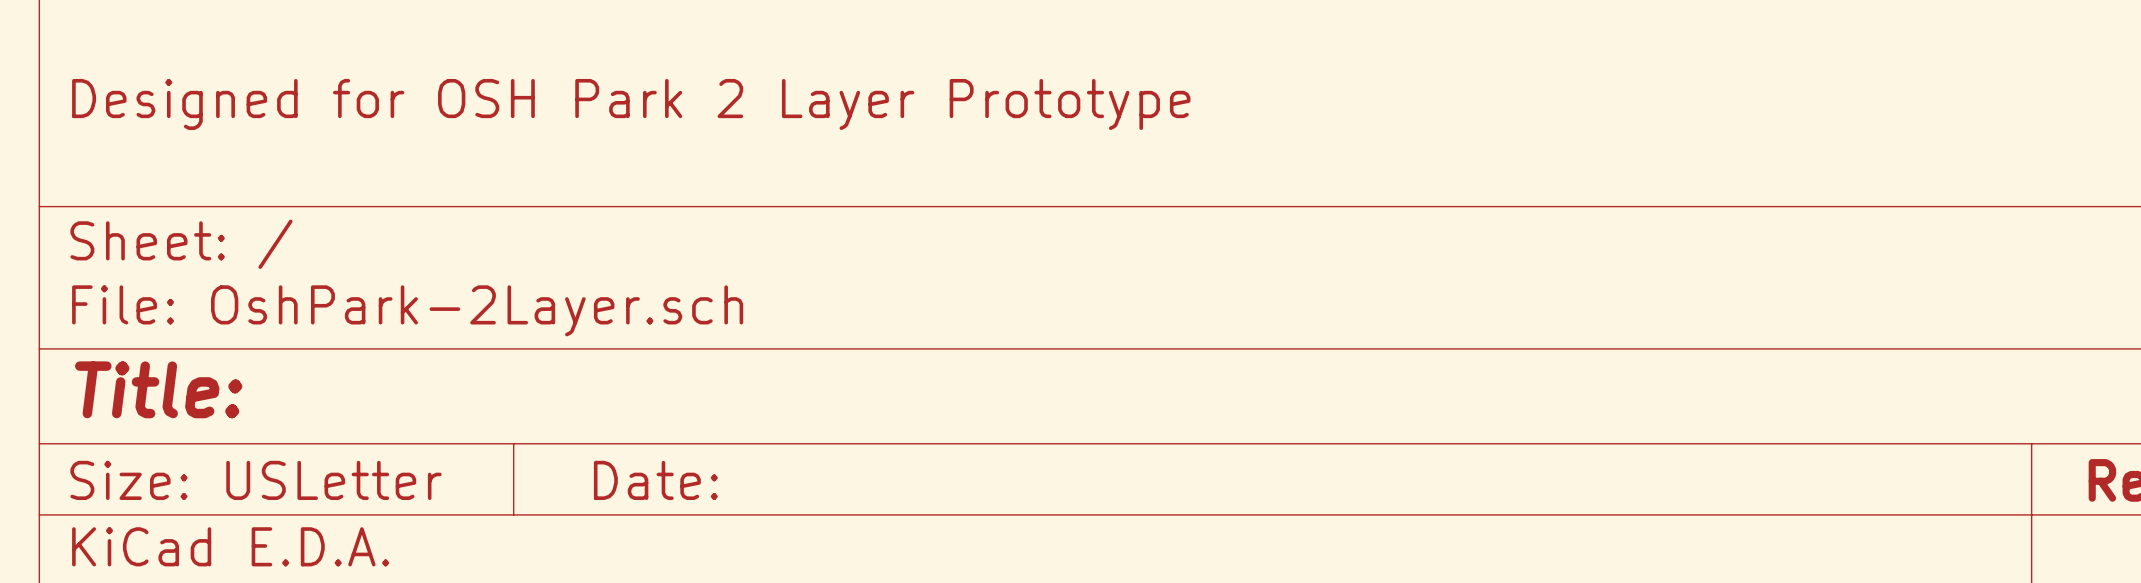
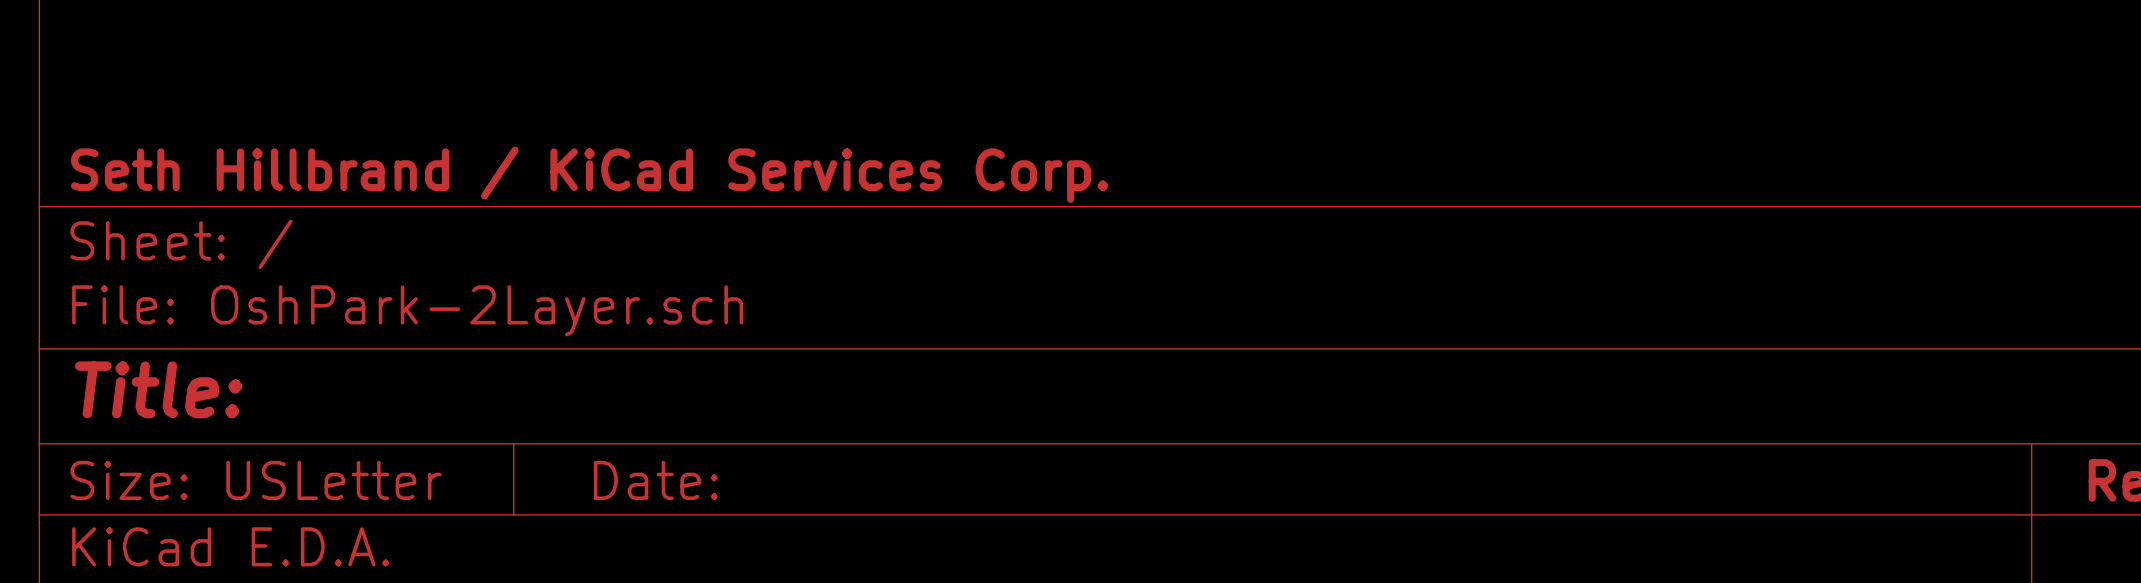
title block: Designed for OSH Park 2 Layer Prototype (631, 104) -> none
title block: none -> Seth Hillbrand / KiCad Services Corp. (589, 174)

